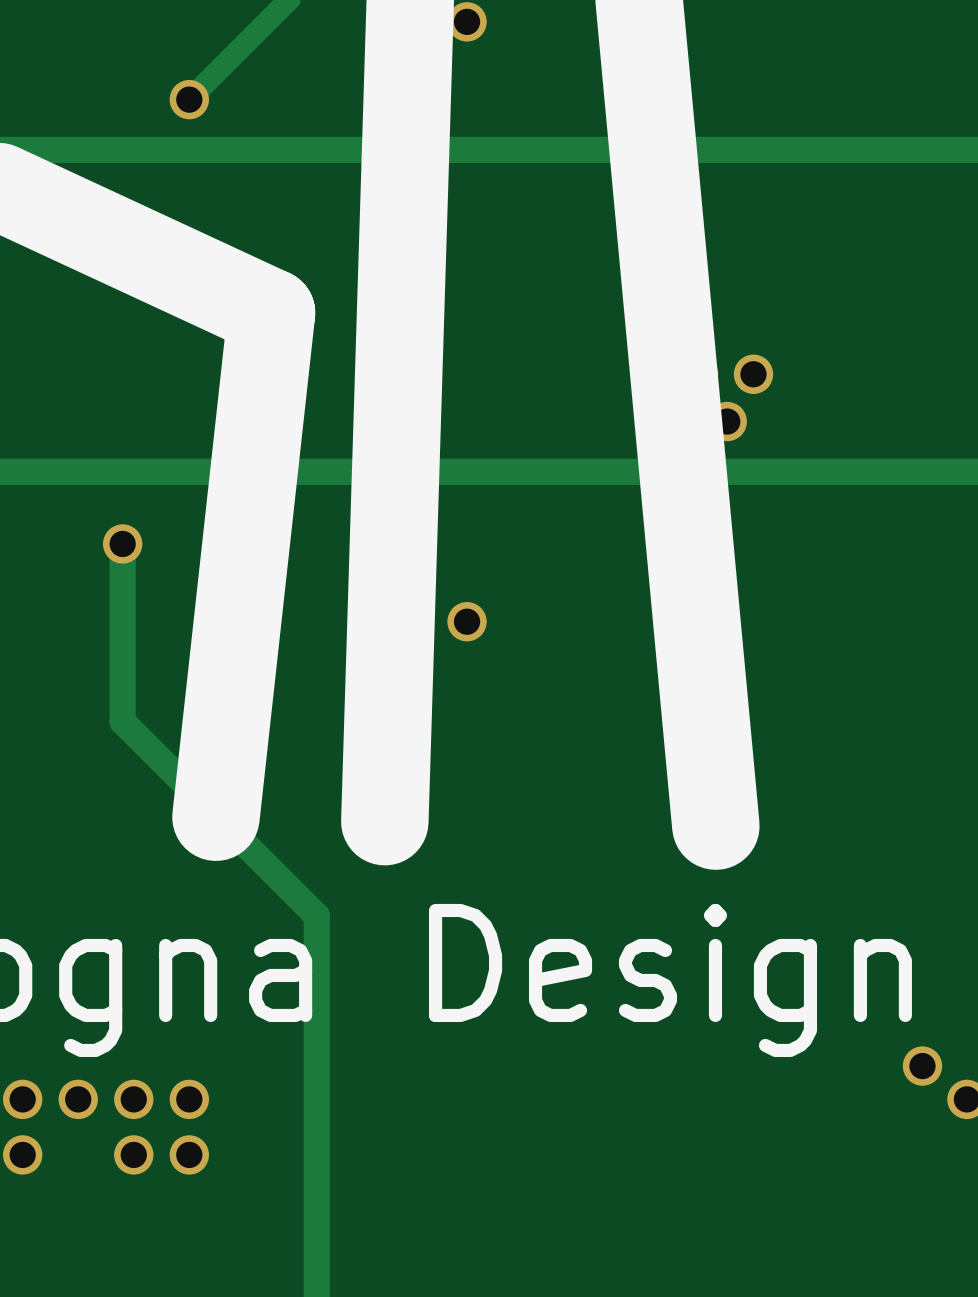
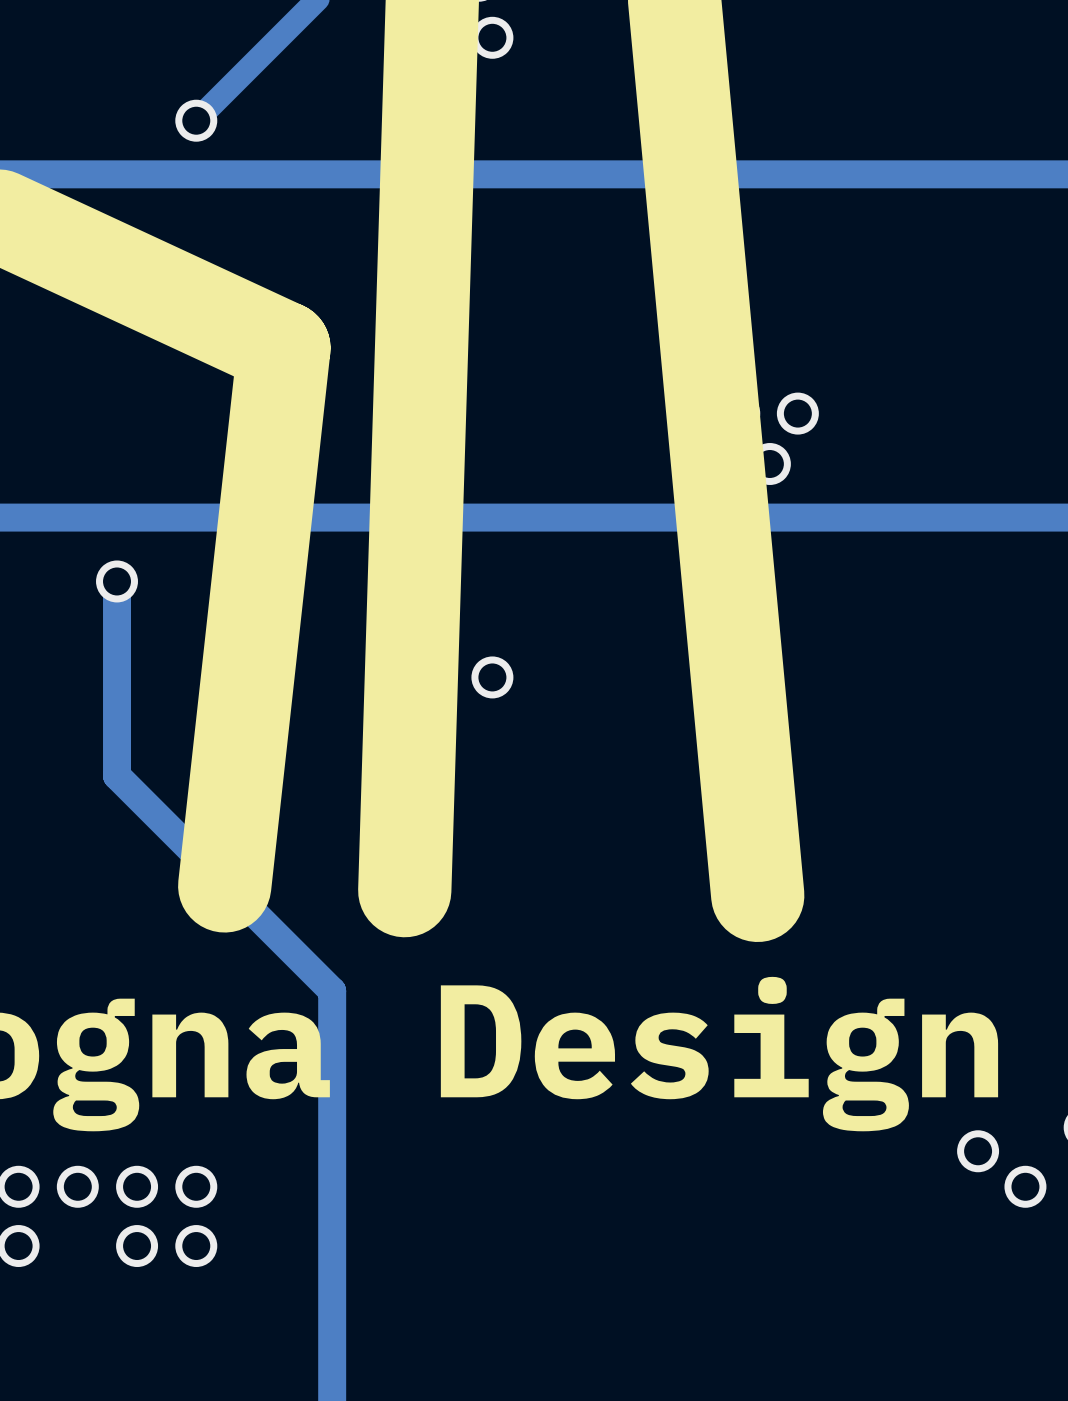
track: (122, 543) (122, 721) -> (117, 581) (117, 775) (125, 784)
via position: (122, 543) -> (117, 581)

